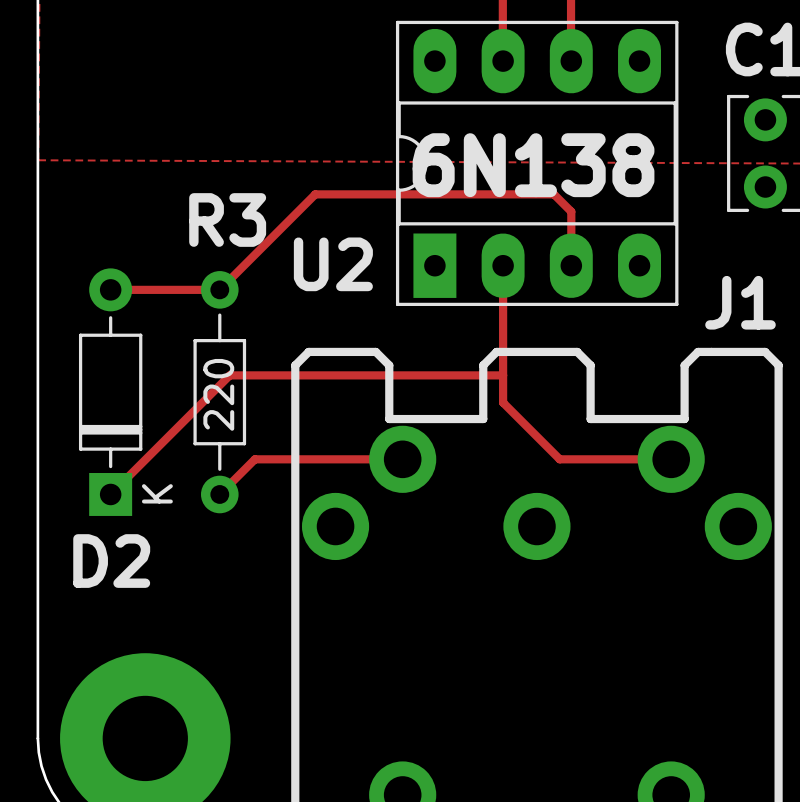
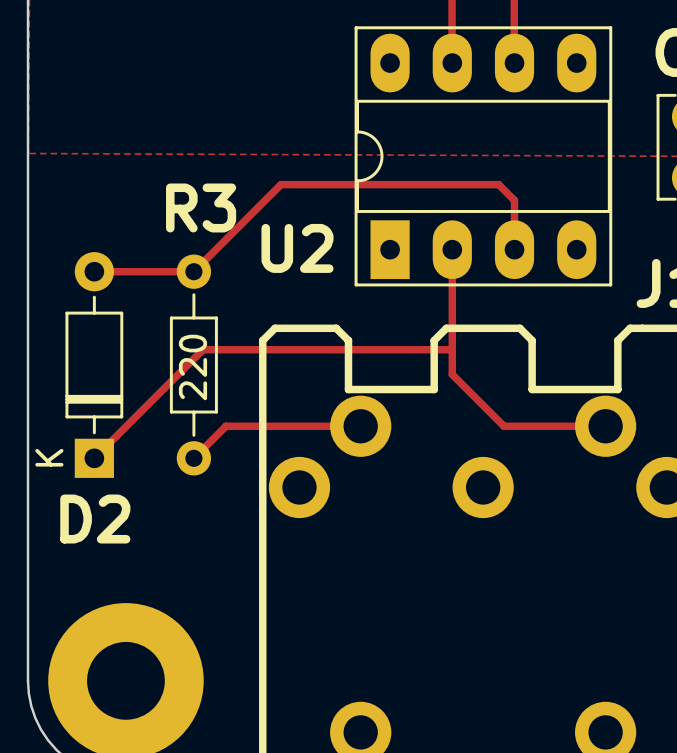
text: 6N138 (533, 165) -> none
D2 text position: K (157, 493) -> K (49, 457)

